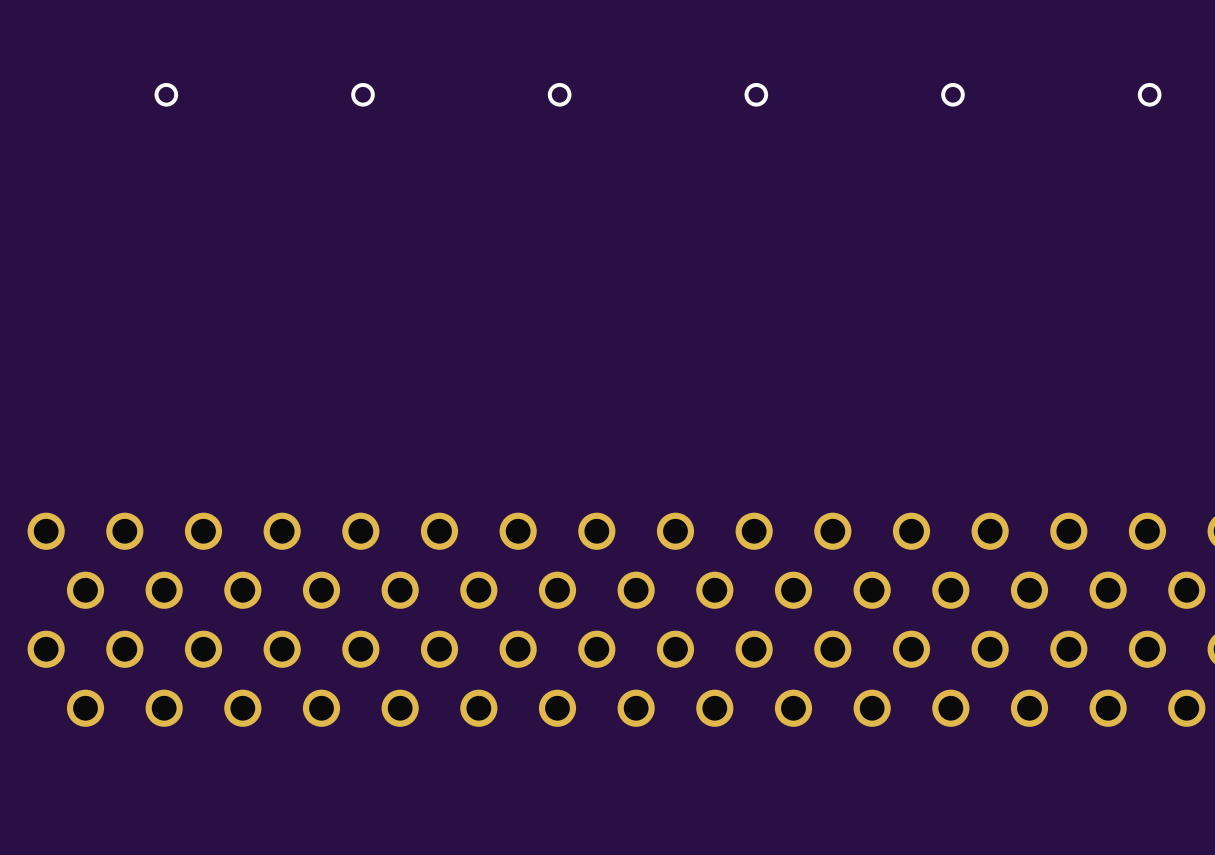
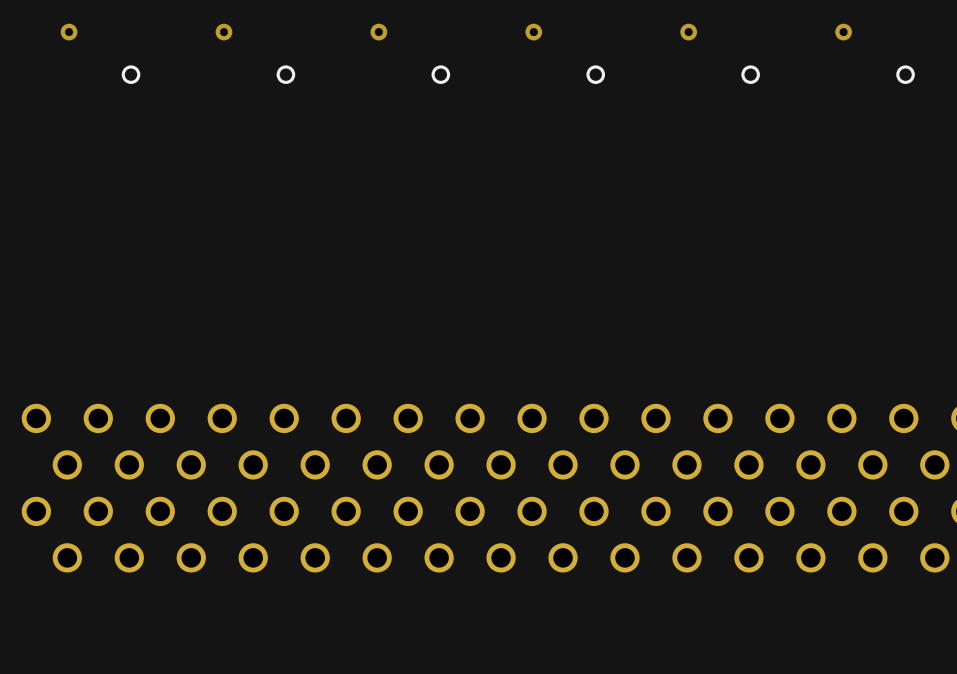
via: none -> (69, 32)
via: none -> (223, 32)
via: none -> (378, 32)
via: none -> (533, 32)
via: none -> (688, 32)
via: none -> (843, 32)

